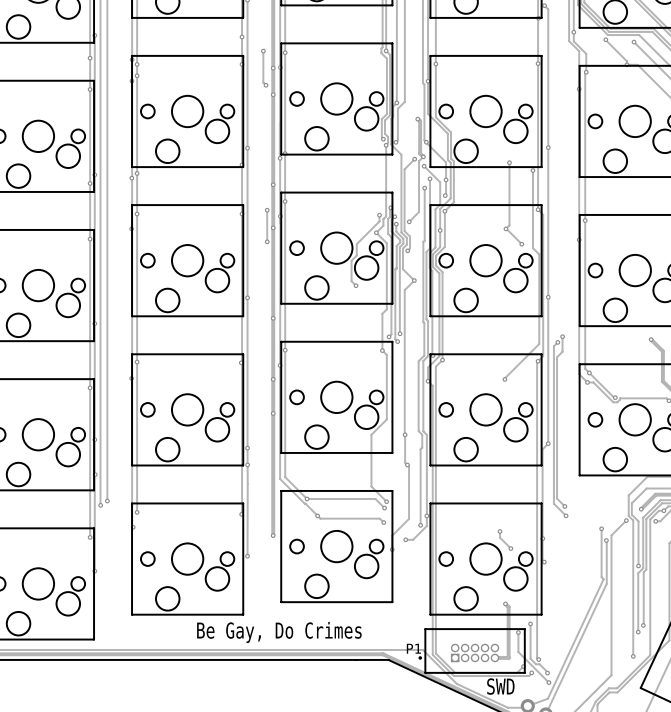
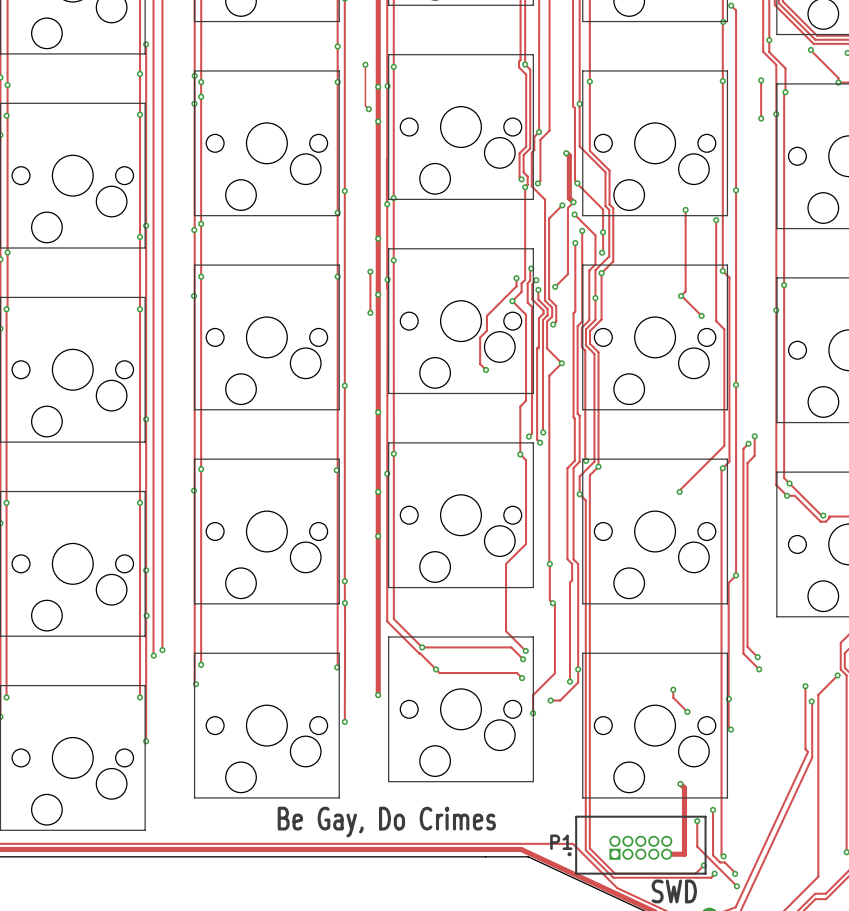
track: none -> (761, 80) (761, 118)
via: none -> (761, 80)
via: none -> (761, 118)

